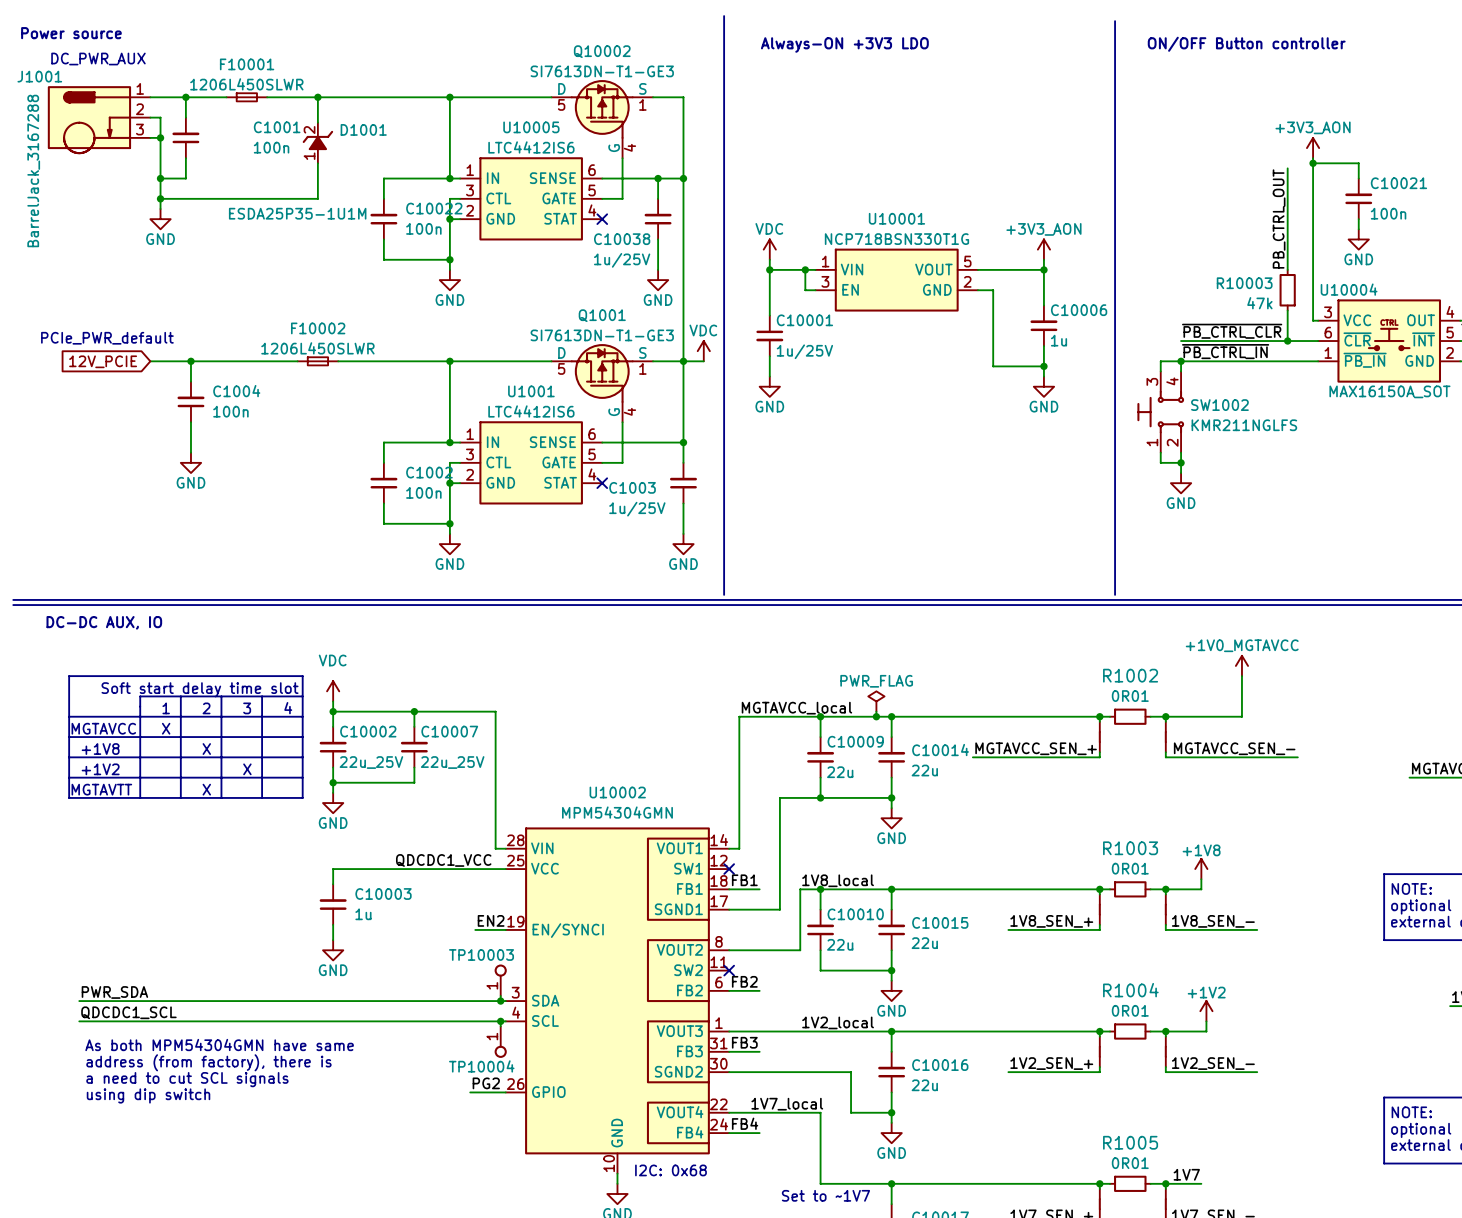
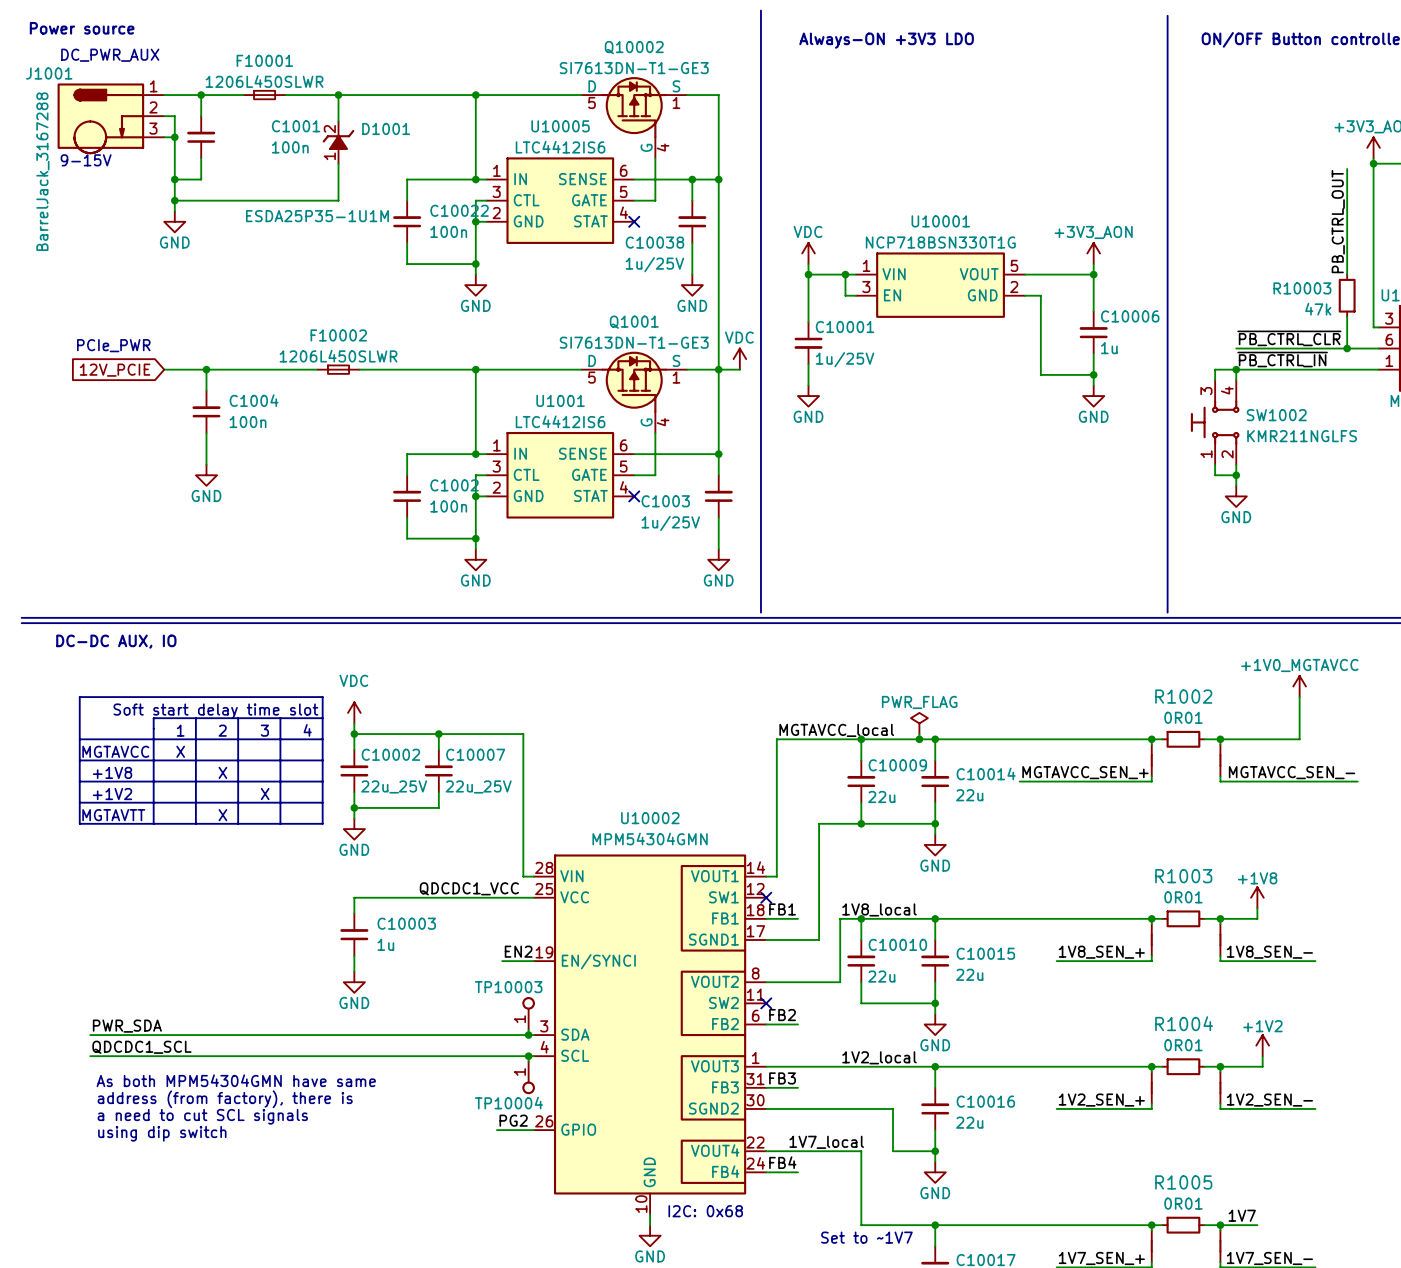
text: none -> 9-15V (86, 160)
text: PCIe_PWR_default (107, 338) -> PCIe_PWR (113, 345)

